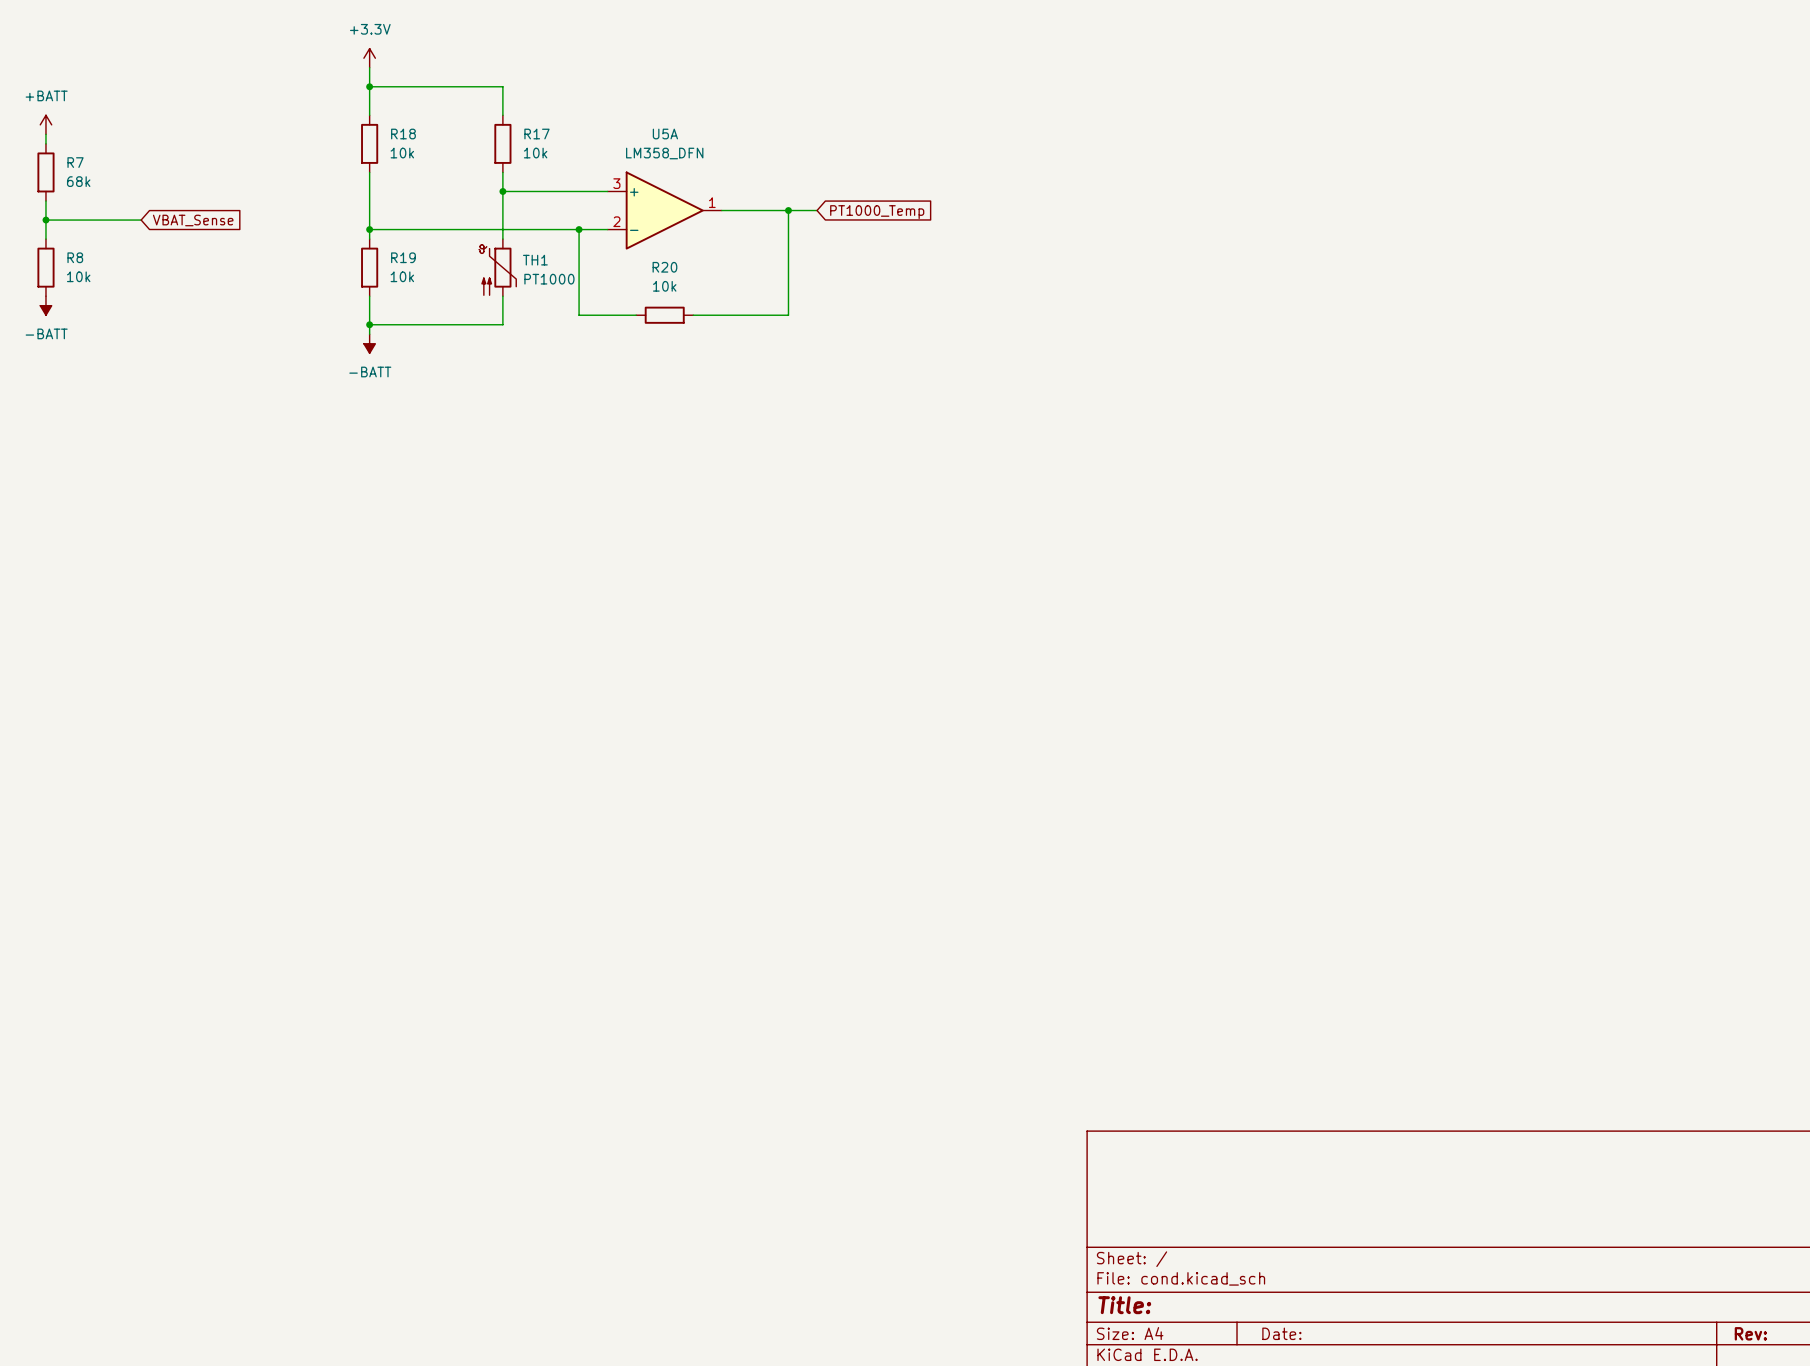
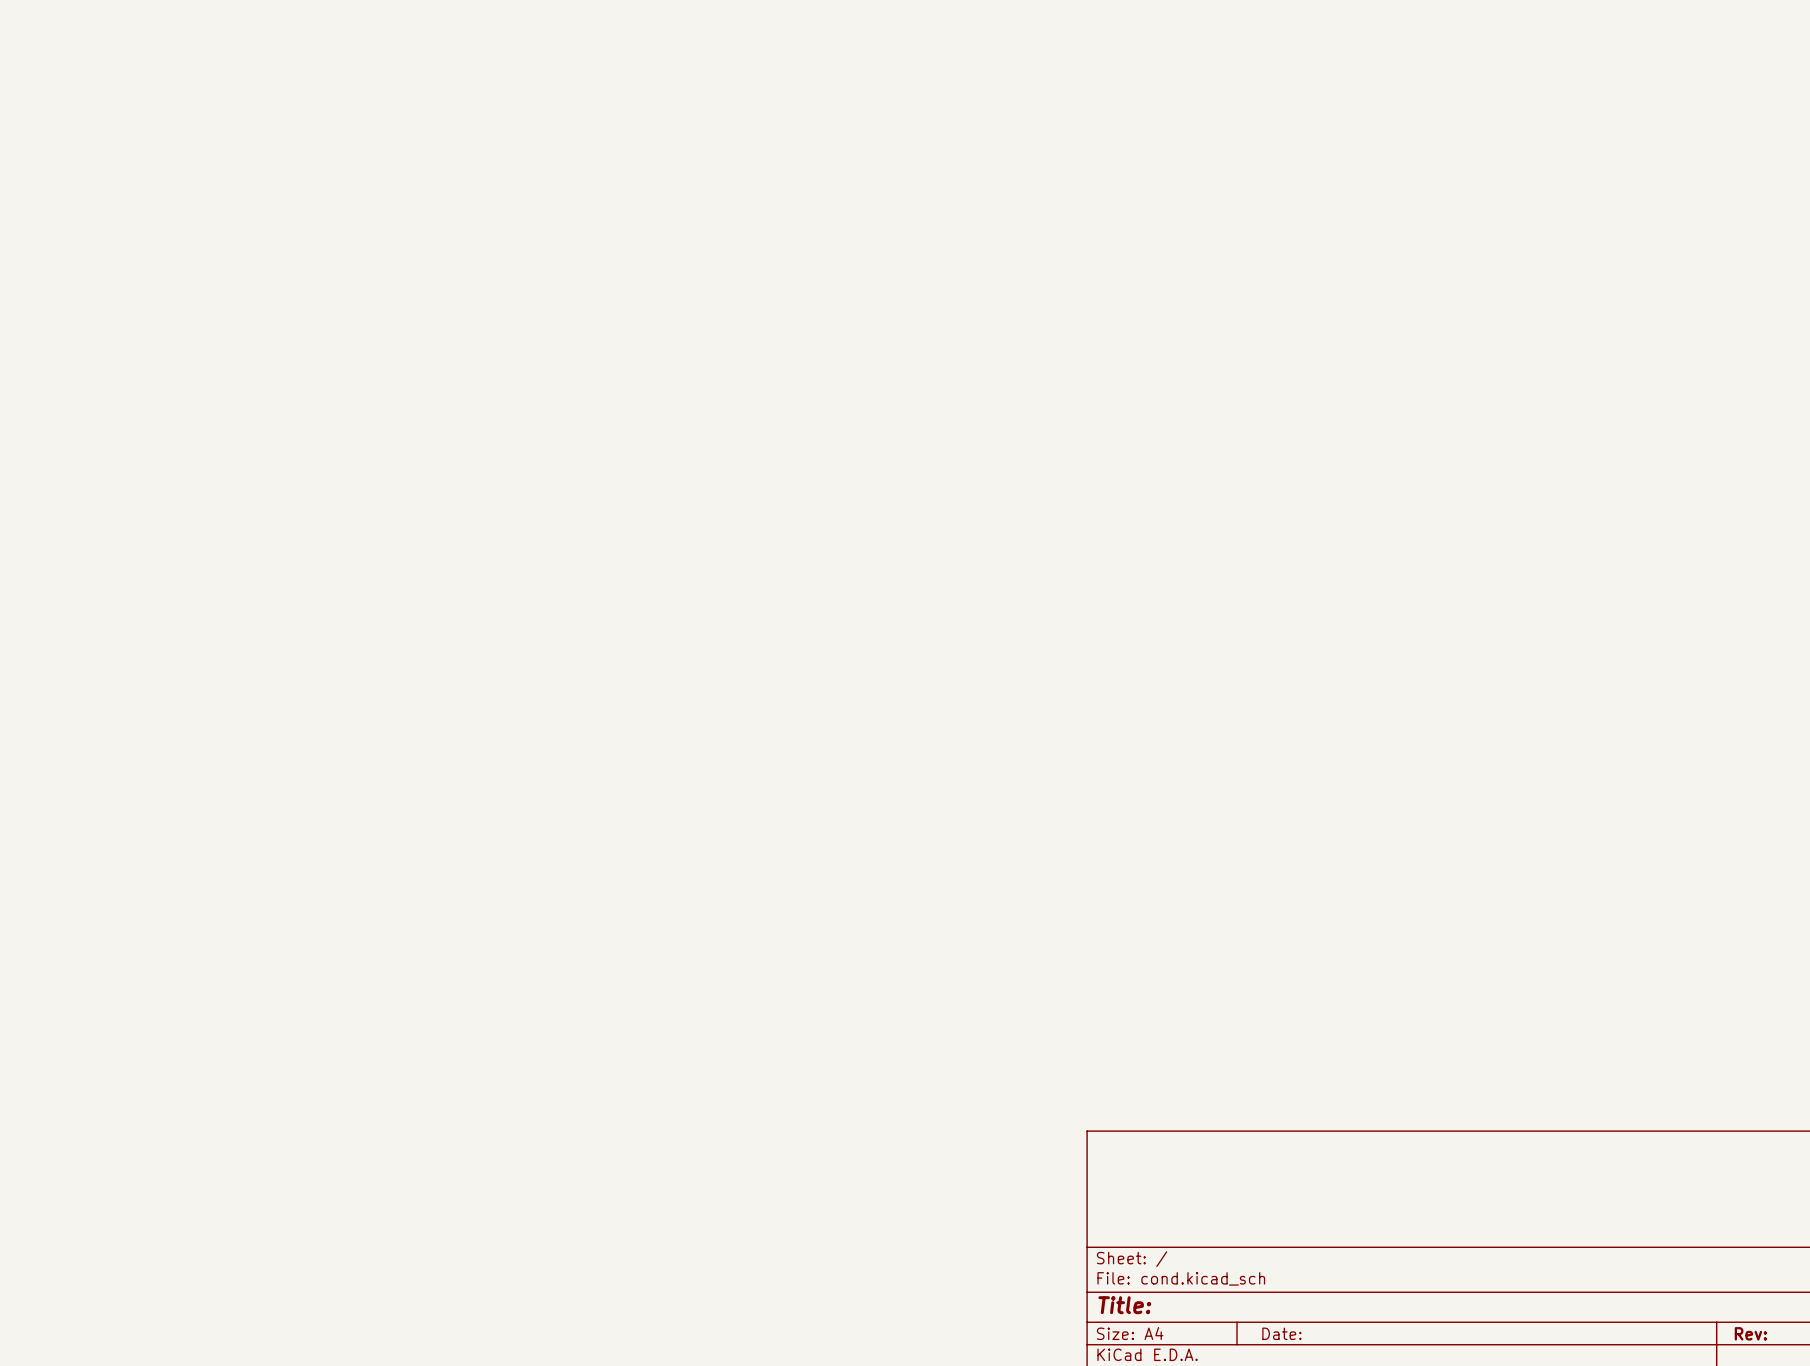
power symbol: +3.3V (369, 58) -> none
wire: (369, 67) (369, 115) -> none
wire: (369, 86) (502, 86) (502, 115) -> none
junction: (369, 86) -> none
power symbol: +BATT (45, 124) -> none
wire: (45, 134) (45, 143) -> none
R18: 10k (369, 143) -> none
R17: 10k (502, 143) -> none
R7: 68k (45, 172) -> none
wire: (369, 172) (369, 239) -> none
wire: (502, 172) (502, 239) -> none
wire: (502, 191) (607, 191) -> none
junction: (502, 191) -> none
wire: (45, 201) (45, 239) -> none
U5A: LM358_DFN (664, 210) -> none
wire: (721, 210) (817, 210) -> none
wire: (788, 210) (788, 315) (693, 315) -> none
junction: (788, 210) -> none
global label: PT1000_Temp (877, 212) -> none
wire: (45, 220) (141, 220) -> none
junction: (45, 220) -> none
global label: VBAT_Sense (193, 220) -> none
wire: (369, 229) (607, 229) -> none
junction: (369, 229) -> none
wire: (579, 229) (579, 315) (636, 315) -> none
junction: (579, 229) -> none
R8: 10k (45, 267) -> none
R19: 10k (369, 267) -> none
TH1: PT1000 (497, 267) -> none
wire: (369, 296) (369, 334) -> none
wire: (502, 296) (502, 324) (369, 324) -> none
power symbol: -BATT (45, 305) -> none
R20: 10k (664, 315) -> none
junction: (369, 324) -> none
power symbol: -BATT (369, 343) -> none

